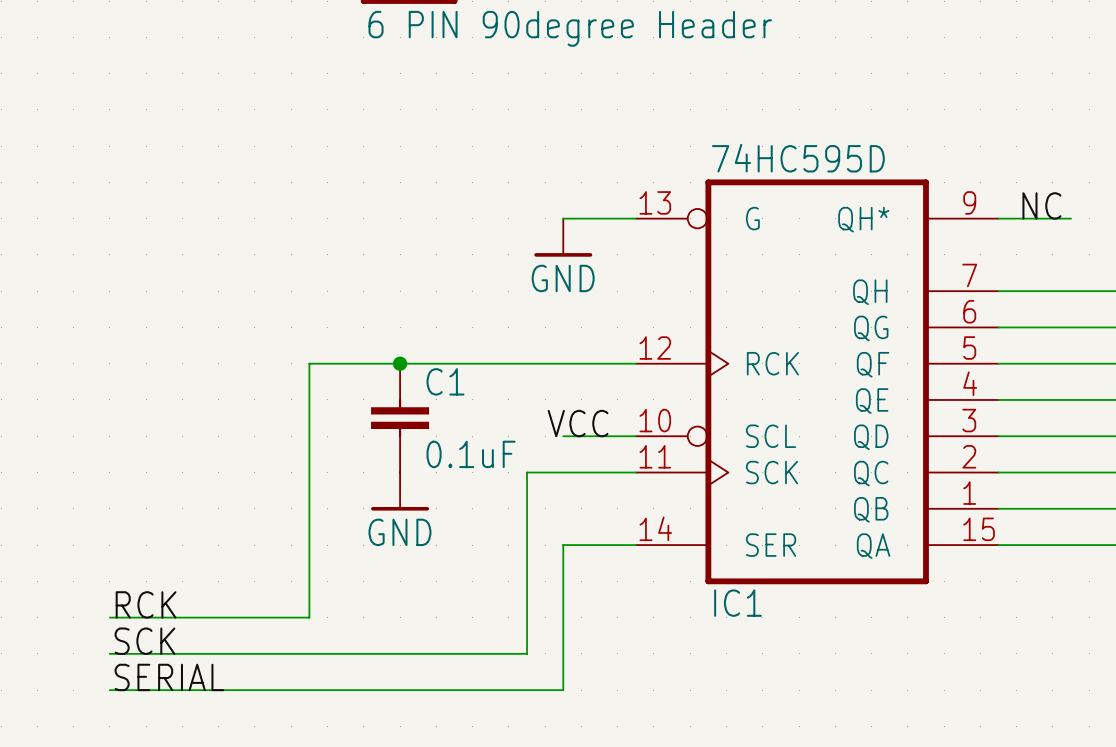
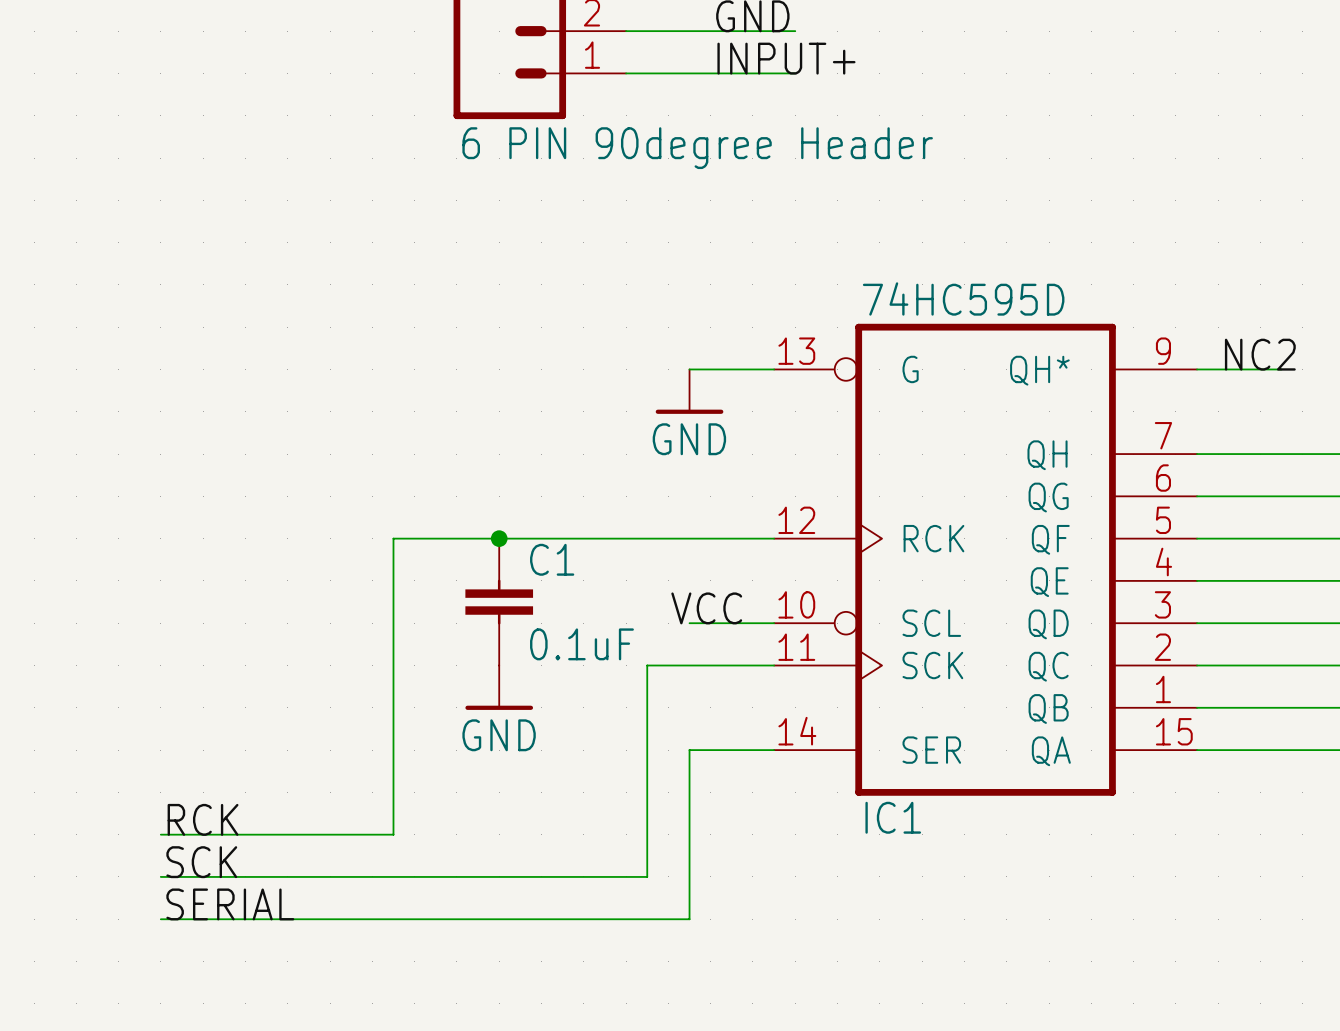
label: NC (1041, 205) -> NC2 (1260, 354)

